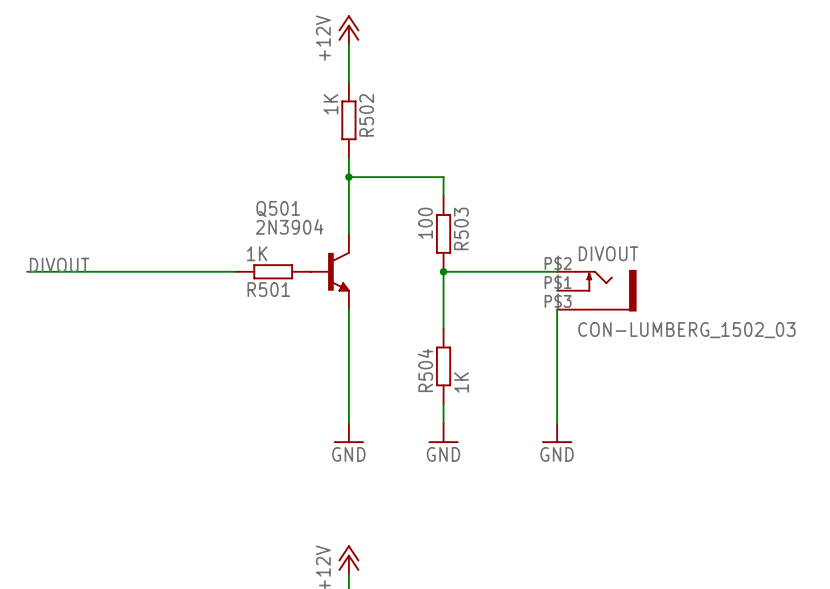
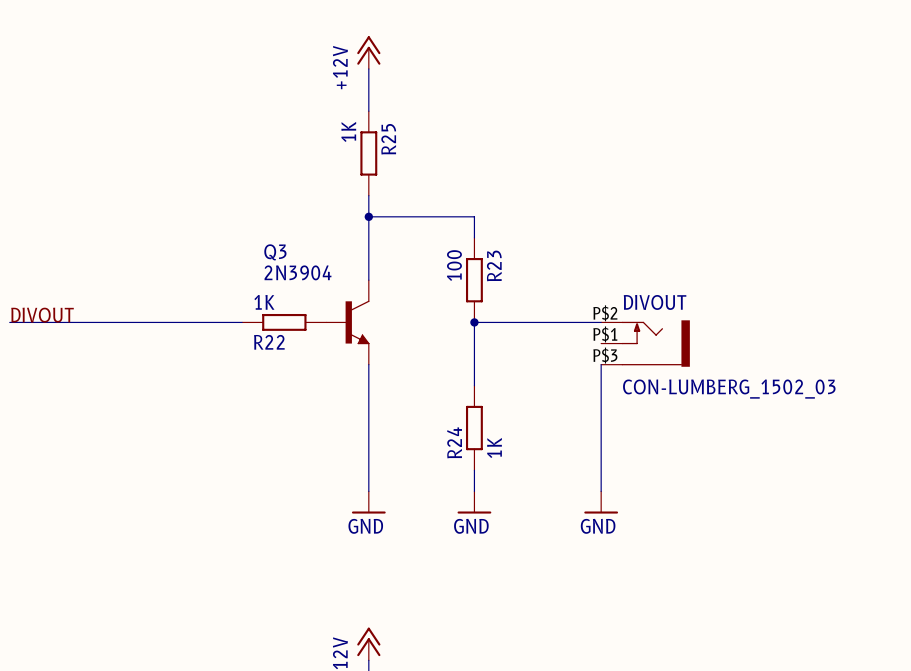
R502 name: R502 (366, 115) -> R25 (388, 139)
Q501 name: Q501 (278, 209) -> Q3 (275, 252)
R503 name: R503 (461, 228) -> R23 (494, 265)
R501 name: R501 (268, 289) -> R22 (269, 342)
R504 name: R504 (425, 370) -> R24 (454, 442)

